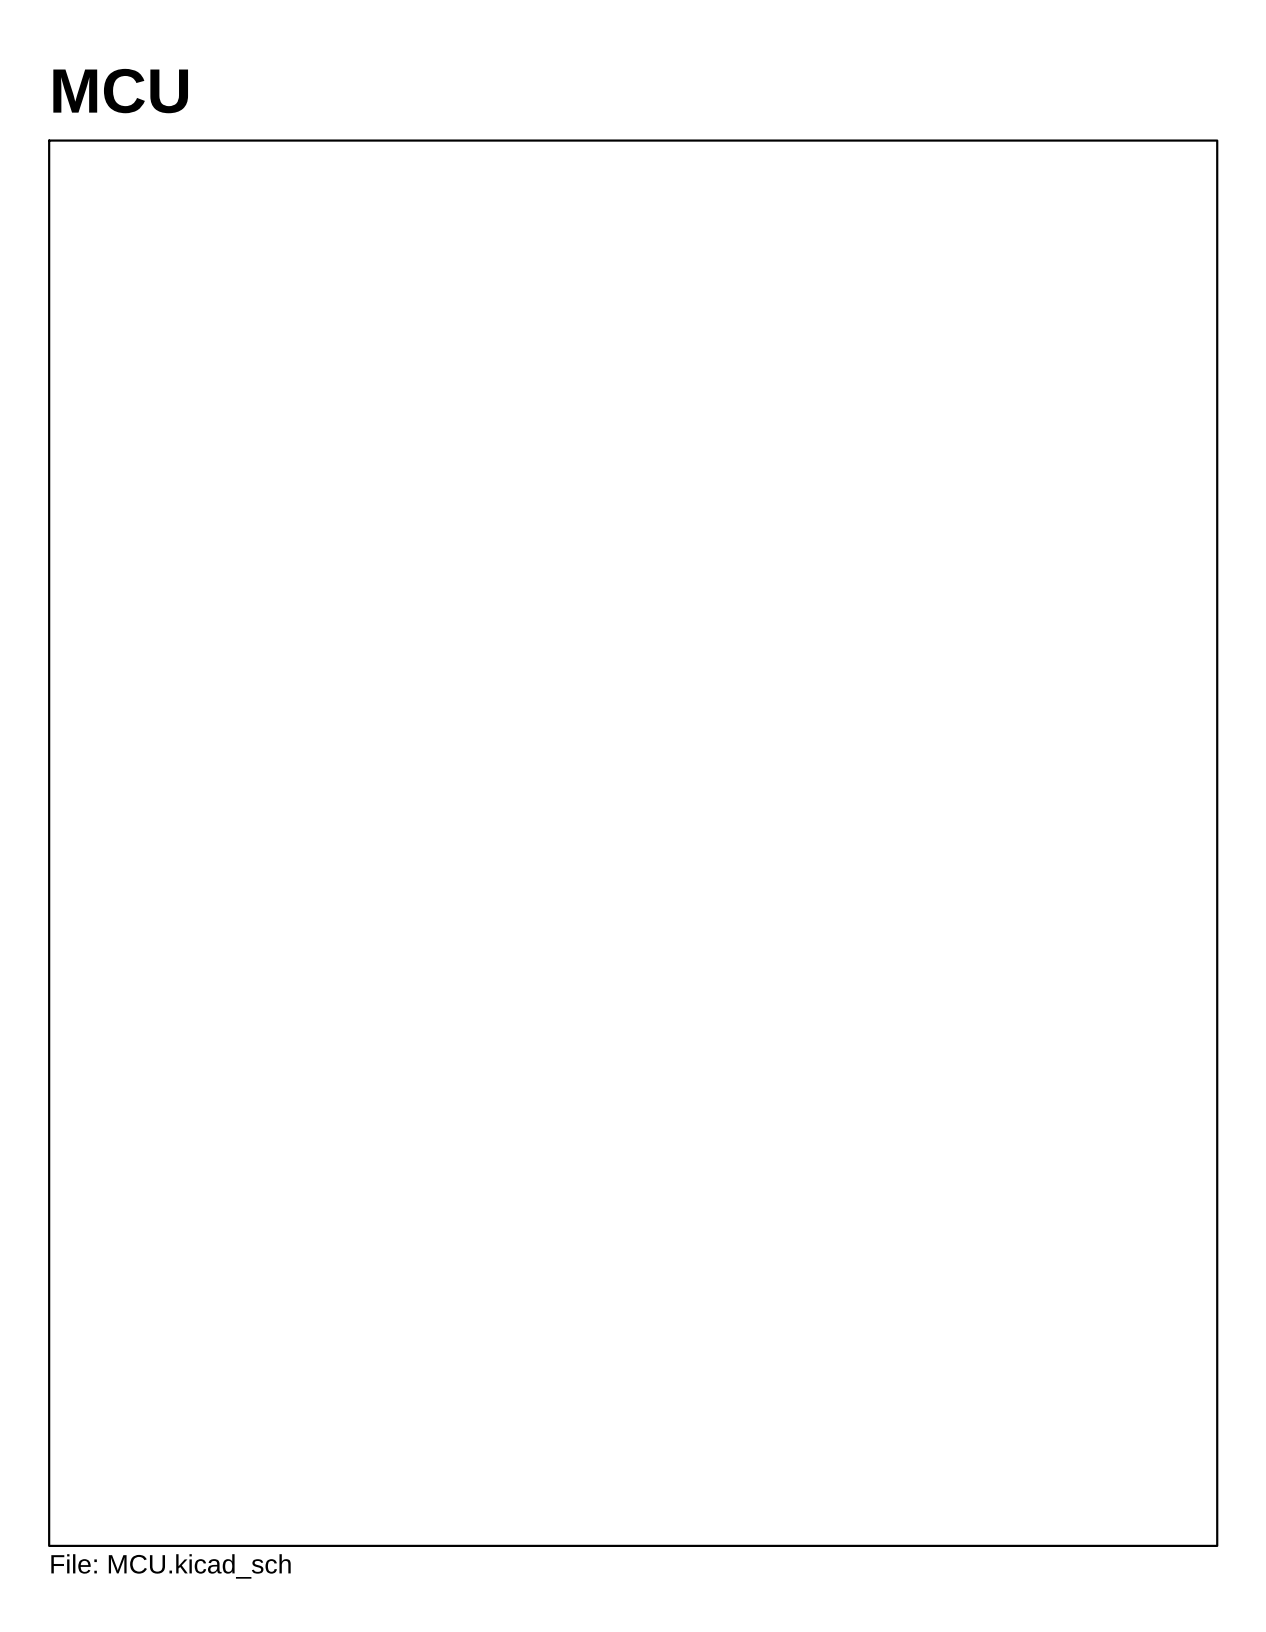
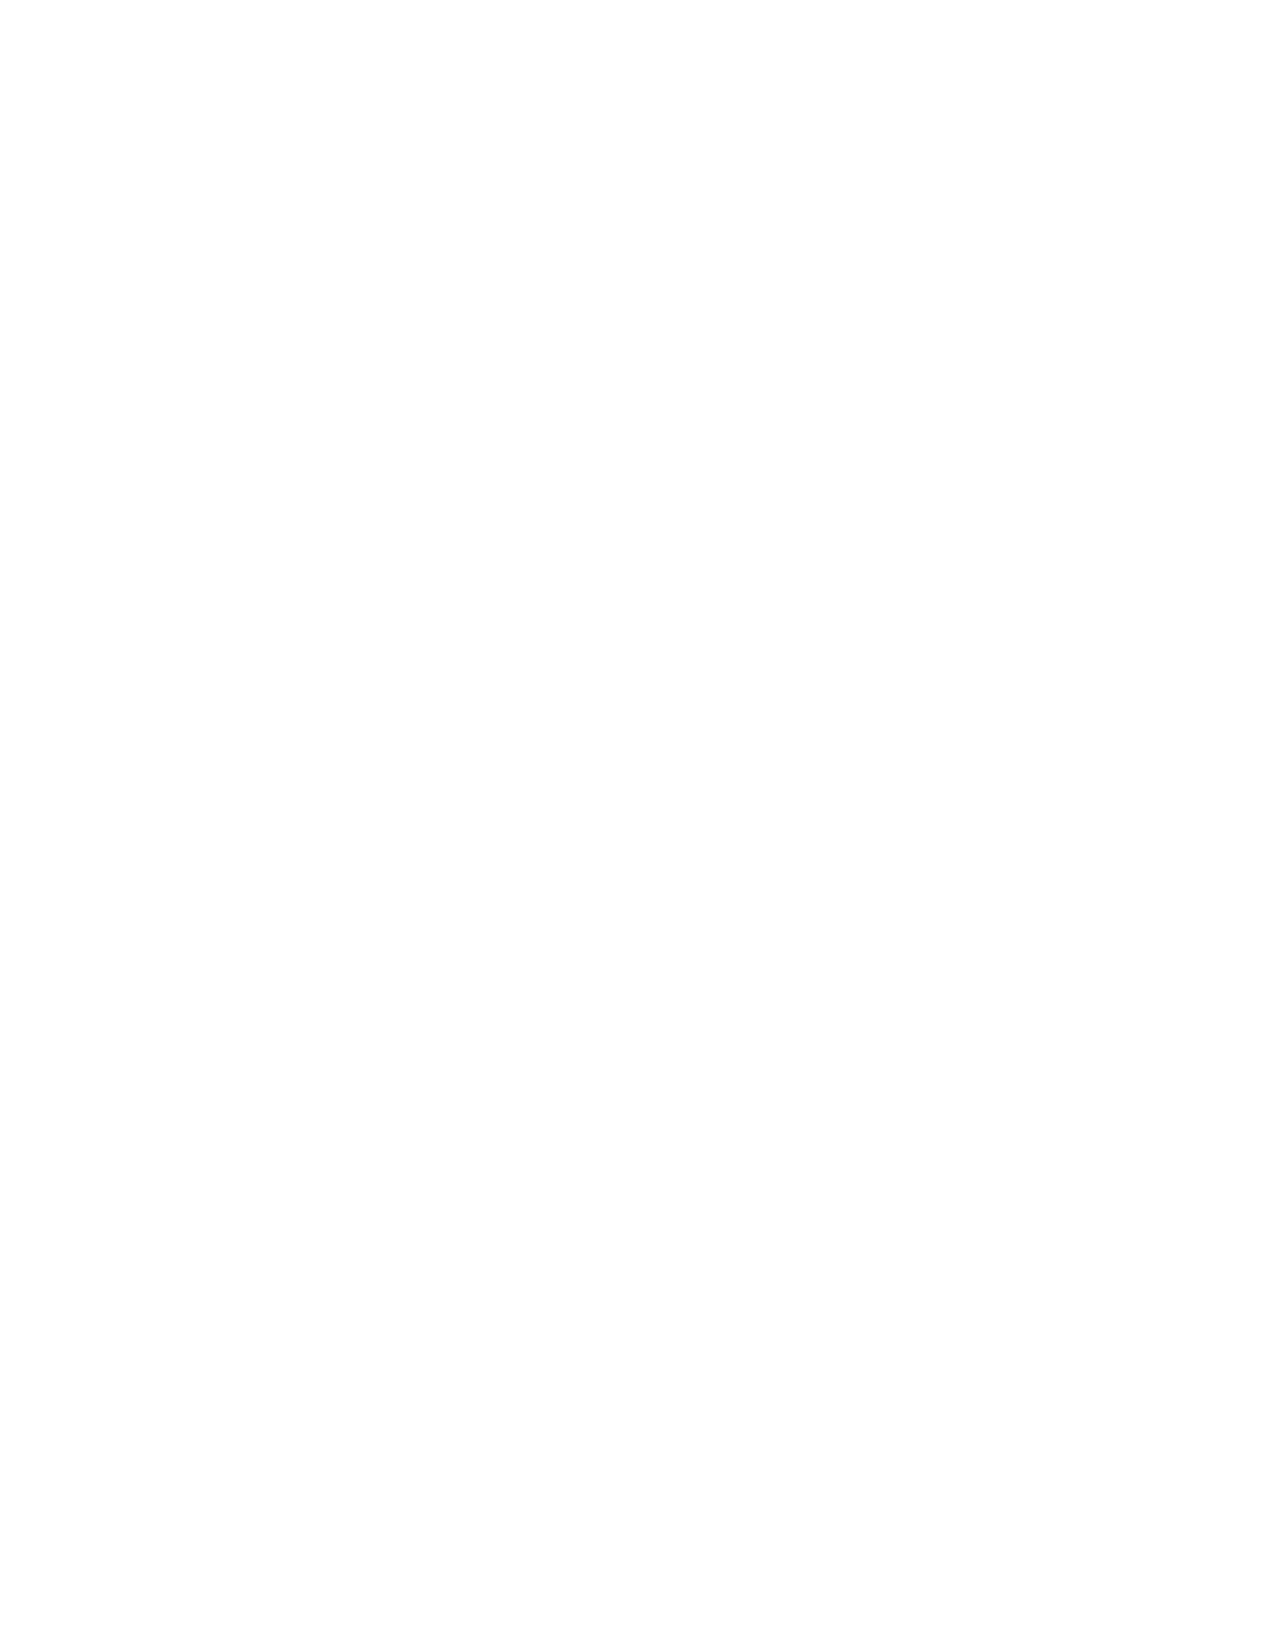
sheet MCU: File: MCU.kicad_sch (633, 843) -> none

